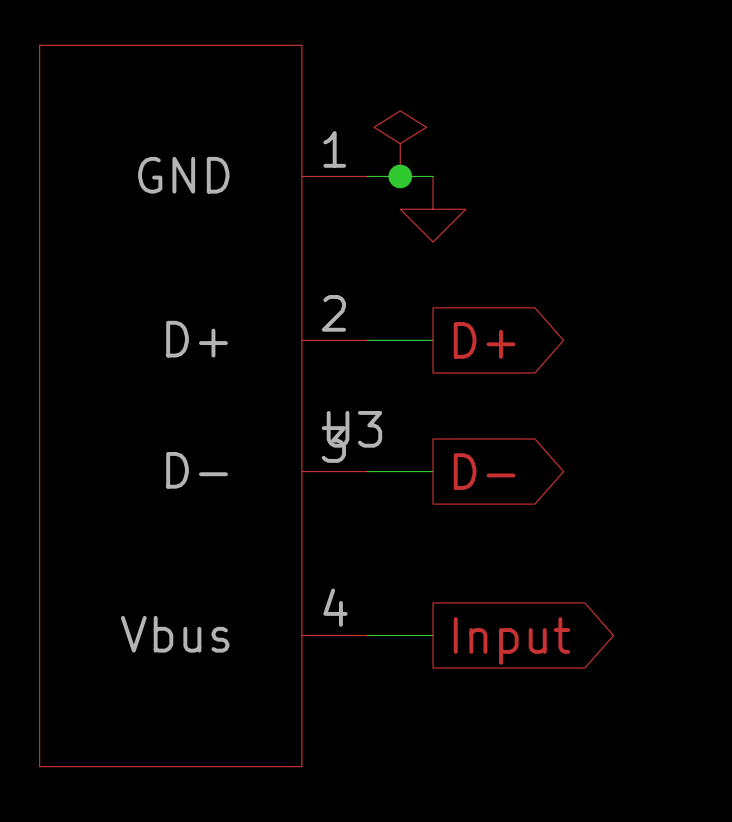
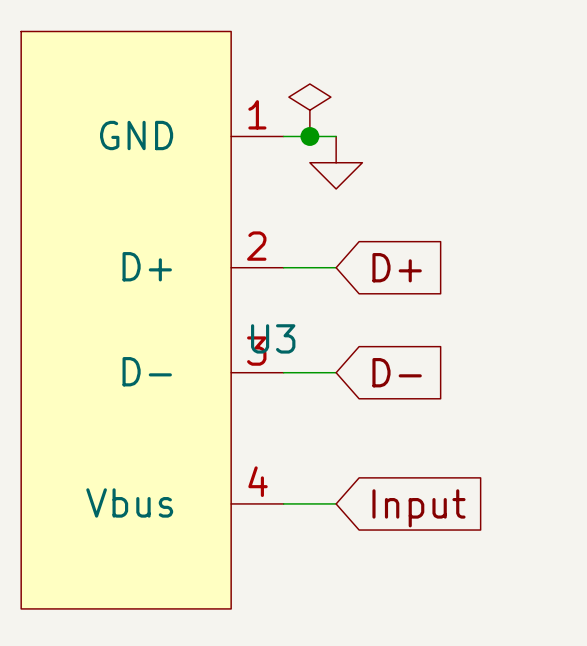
global label shape: output (484, 340) -> input (397, 267)
global label shape: output (484, 471) -> input (397, 372)
global label shape: output (511, 640) -> input (418, 508)

